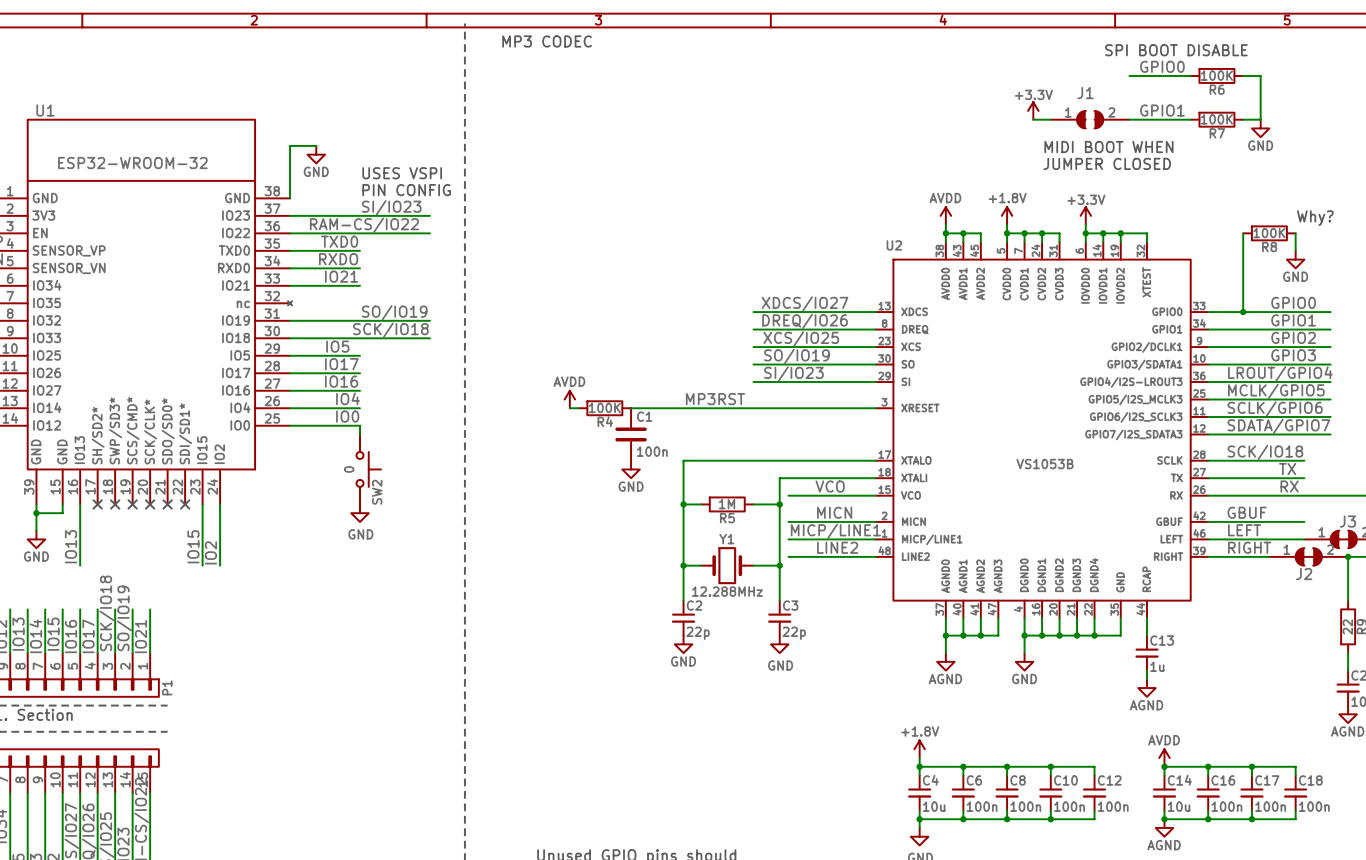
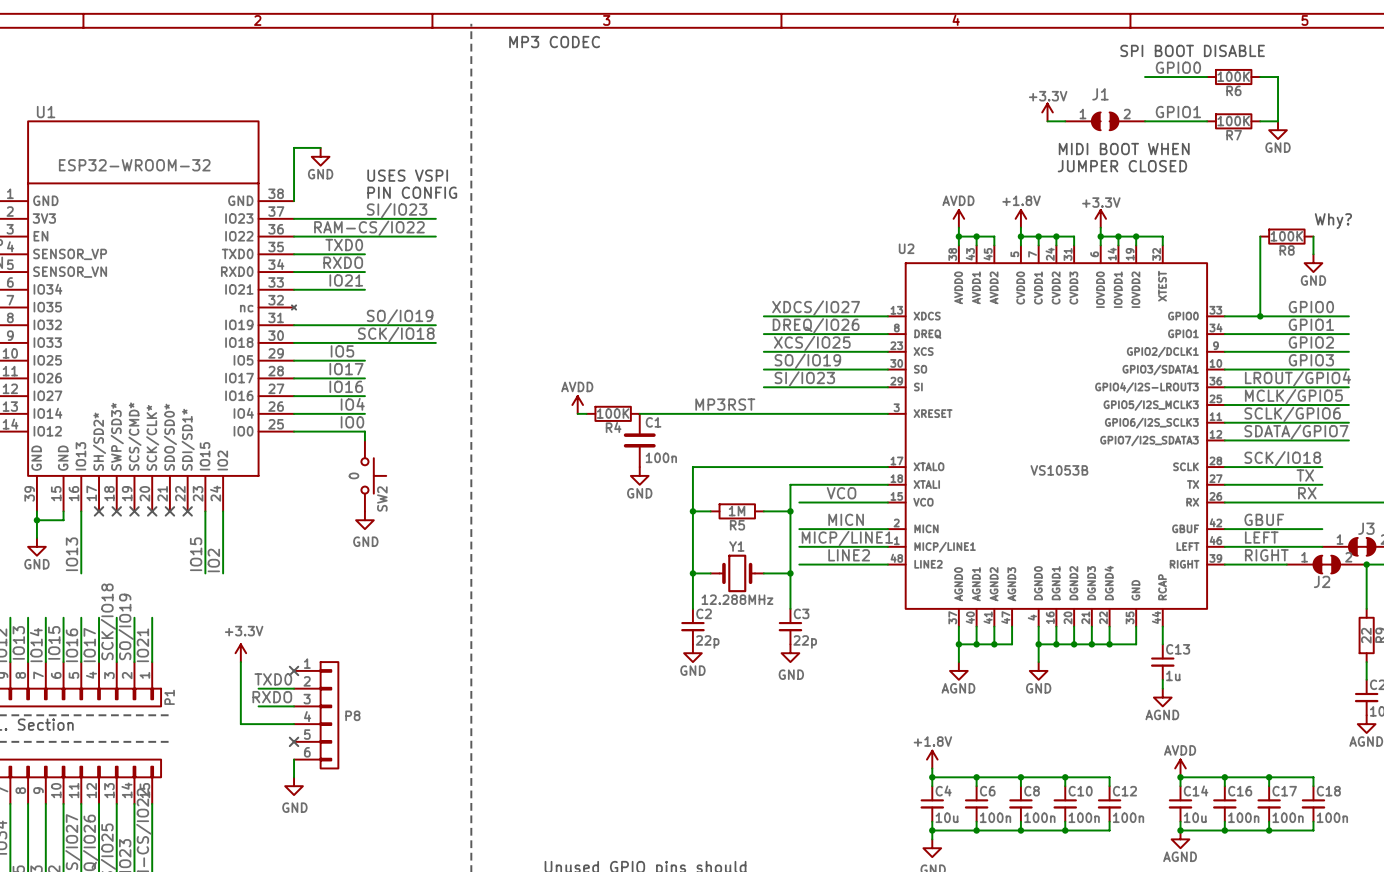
power symbol: none -> +3.3V (240, 653)
wire: none -> (240, 662) (240, 724) (294, 724)
no-connect mark: none -> (294, 670)
label: none -> TXD0 (273, 679)
wire: none -> (258, 688) (294, 688)
label: none -> RXDO (272, 697)
wire: none -> (258, 706) (294, 706)
P8: none -> (316, 715)
no-connect mark: none -> (294, 741)
wire: none -> (294, 759) (294, 777)
power symbol: none -> GND (294, 786)

